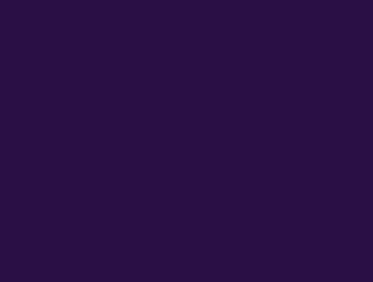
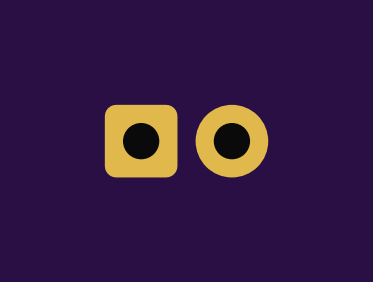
part: none -> (186, 141)

